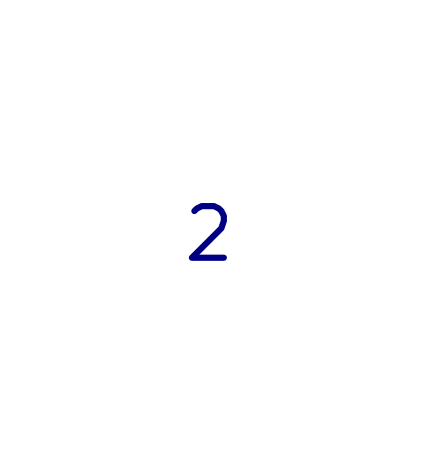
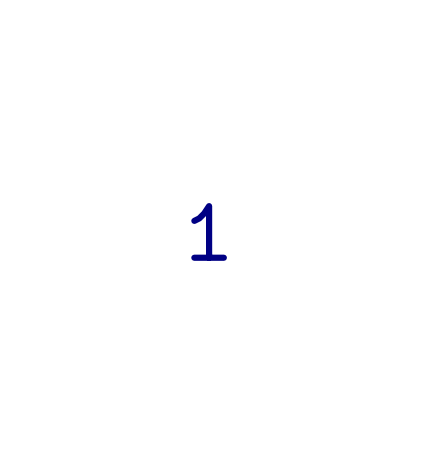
text: 2 (207, 231) -> 1 (209, 231)

